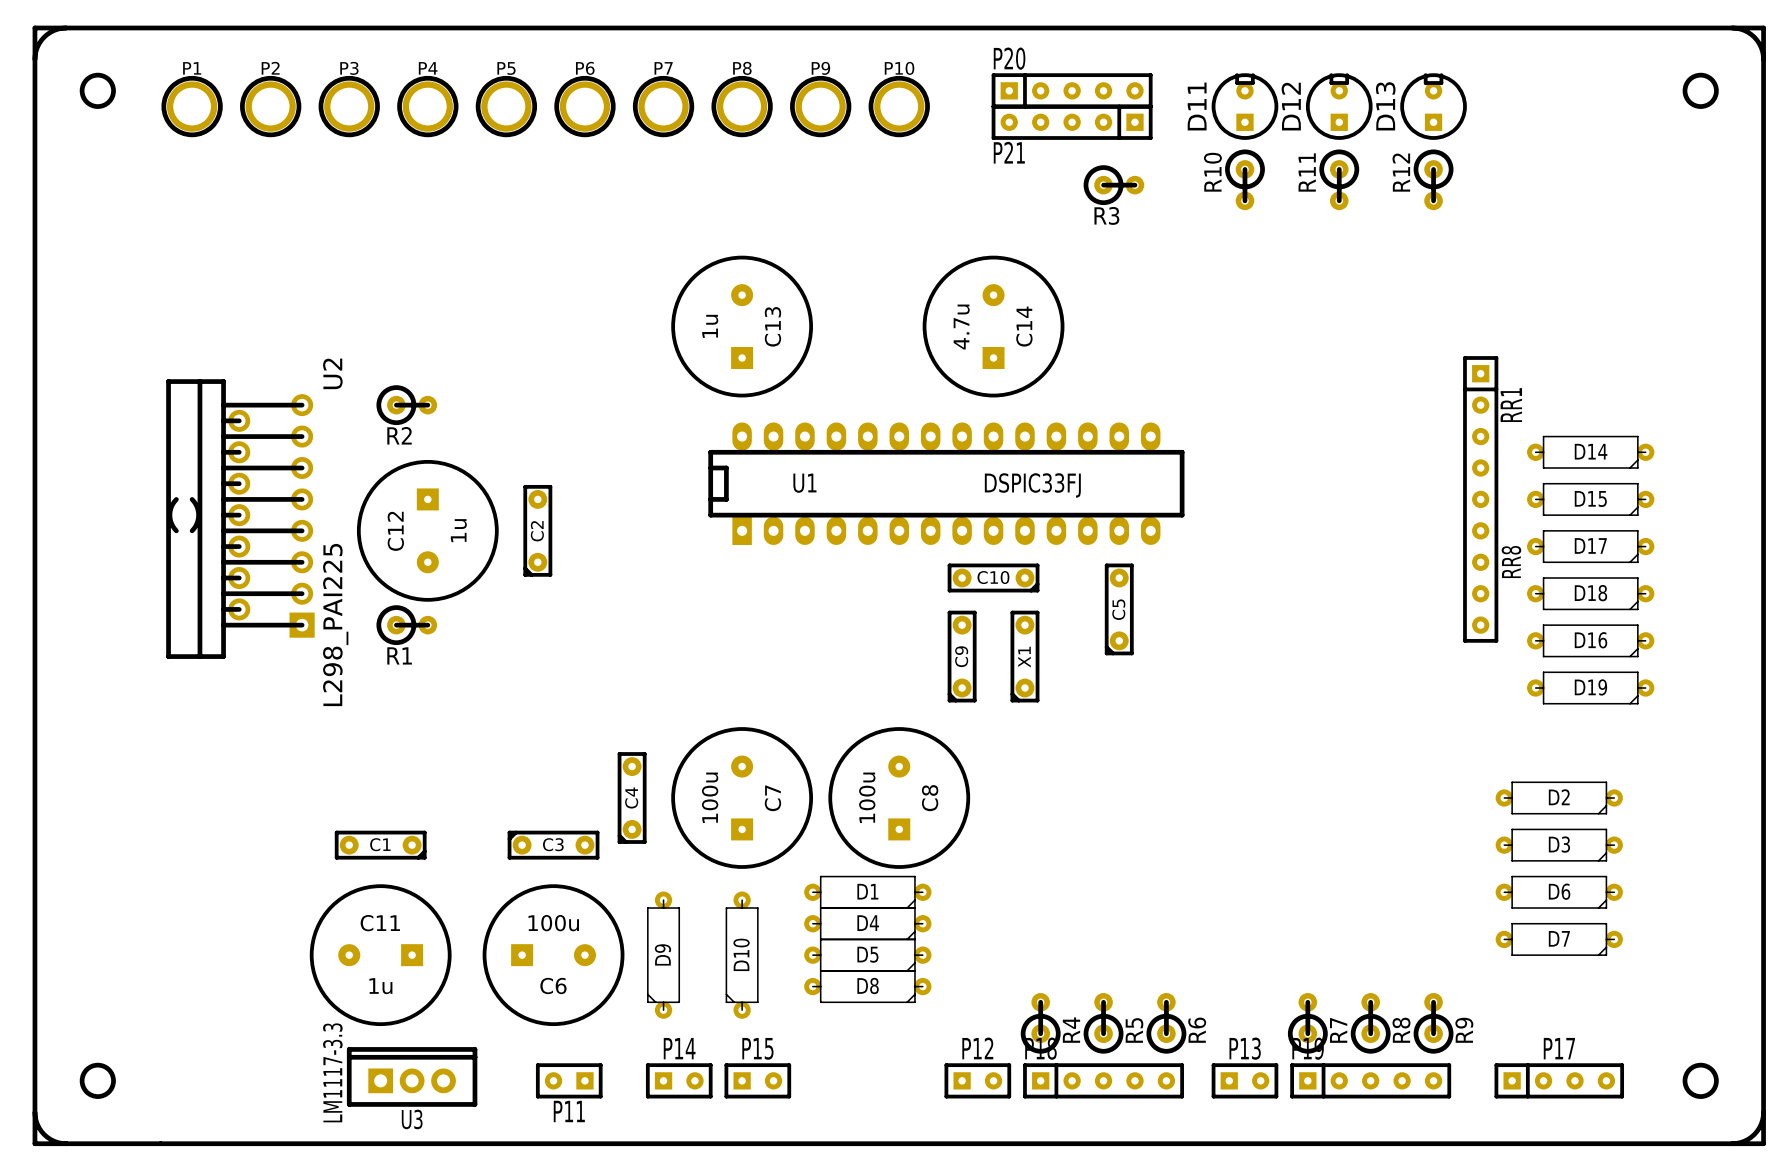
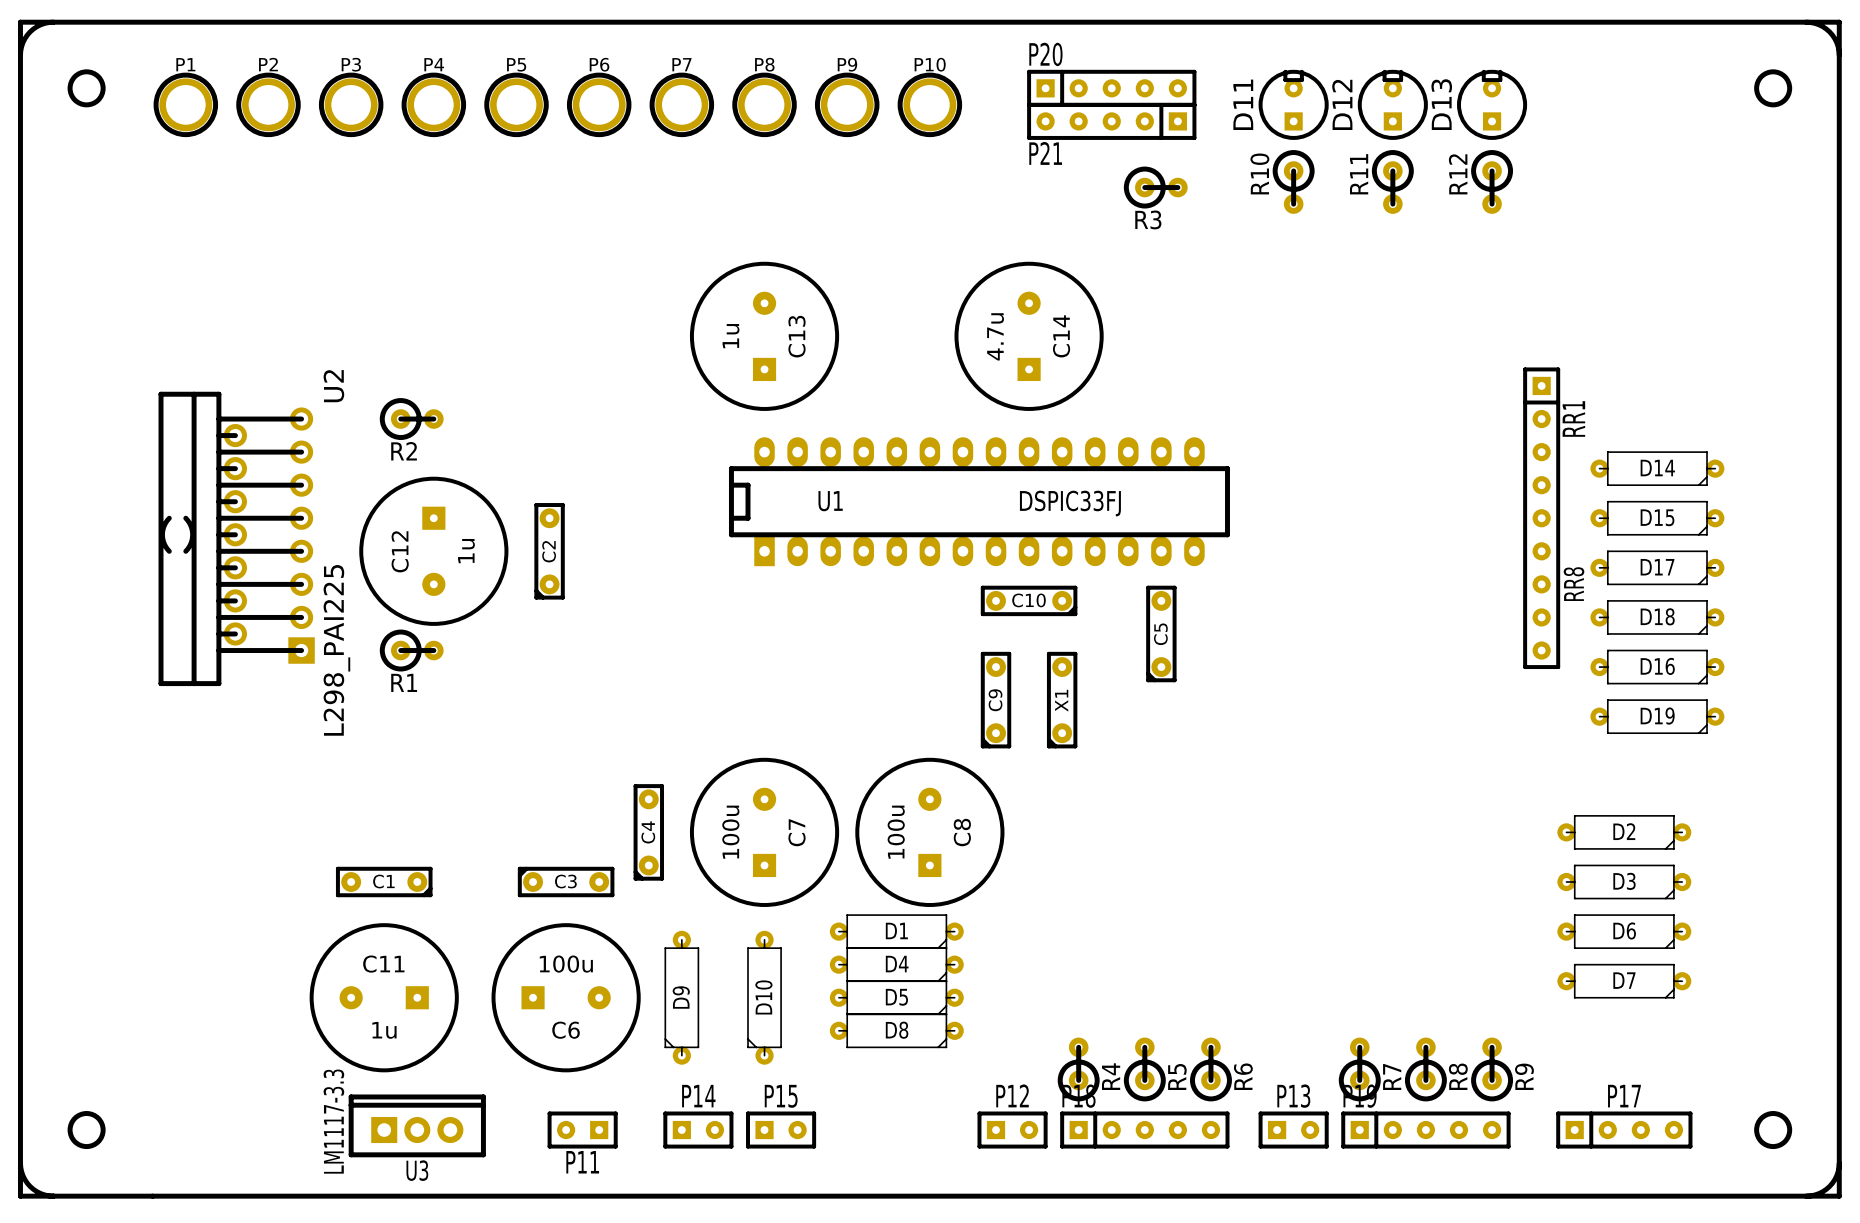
C9 position: (962, 656) -> (996, 700)
X1 position: (1024, 656) -> (1062, 700)

